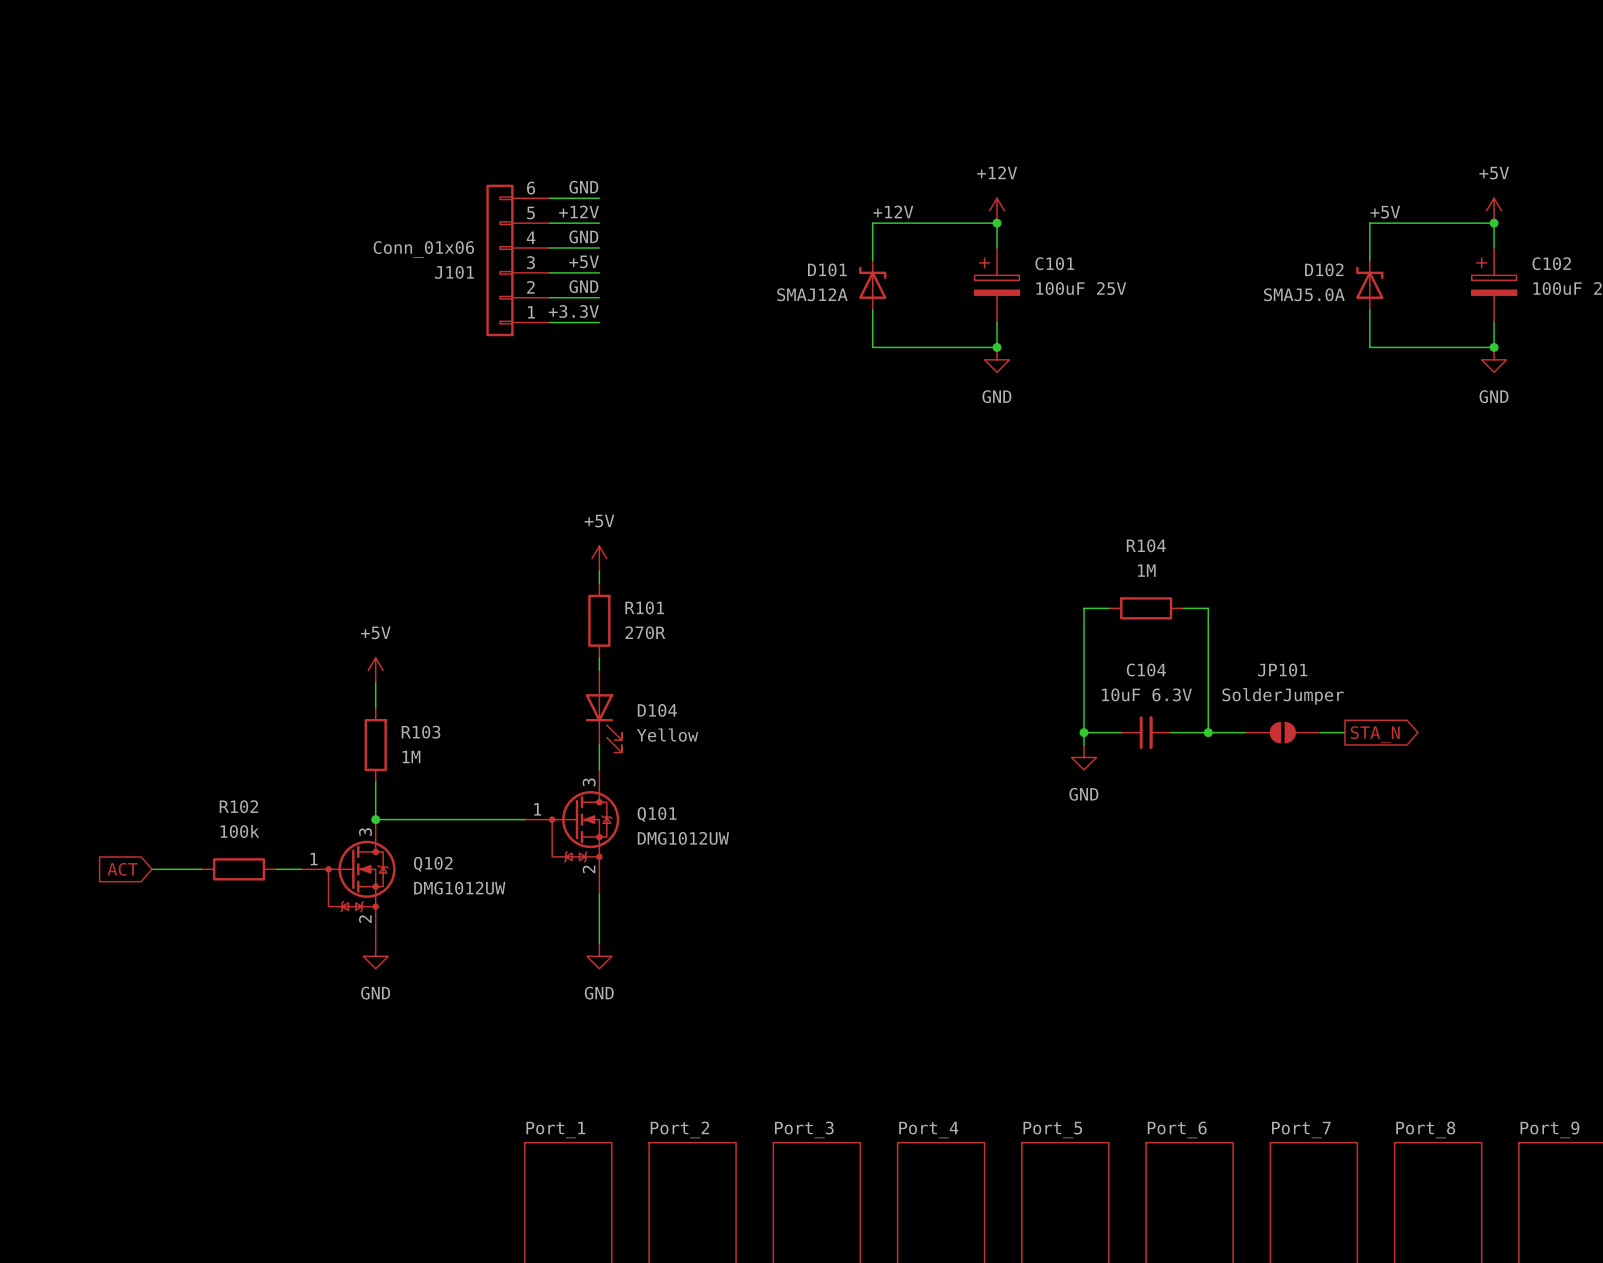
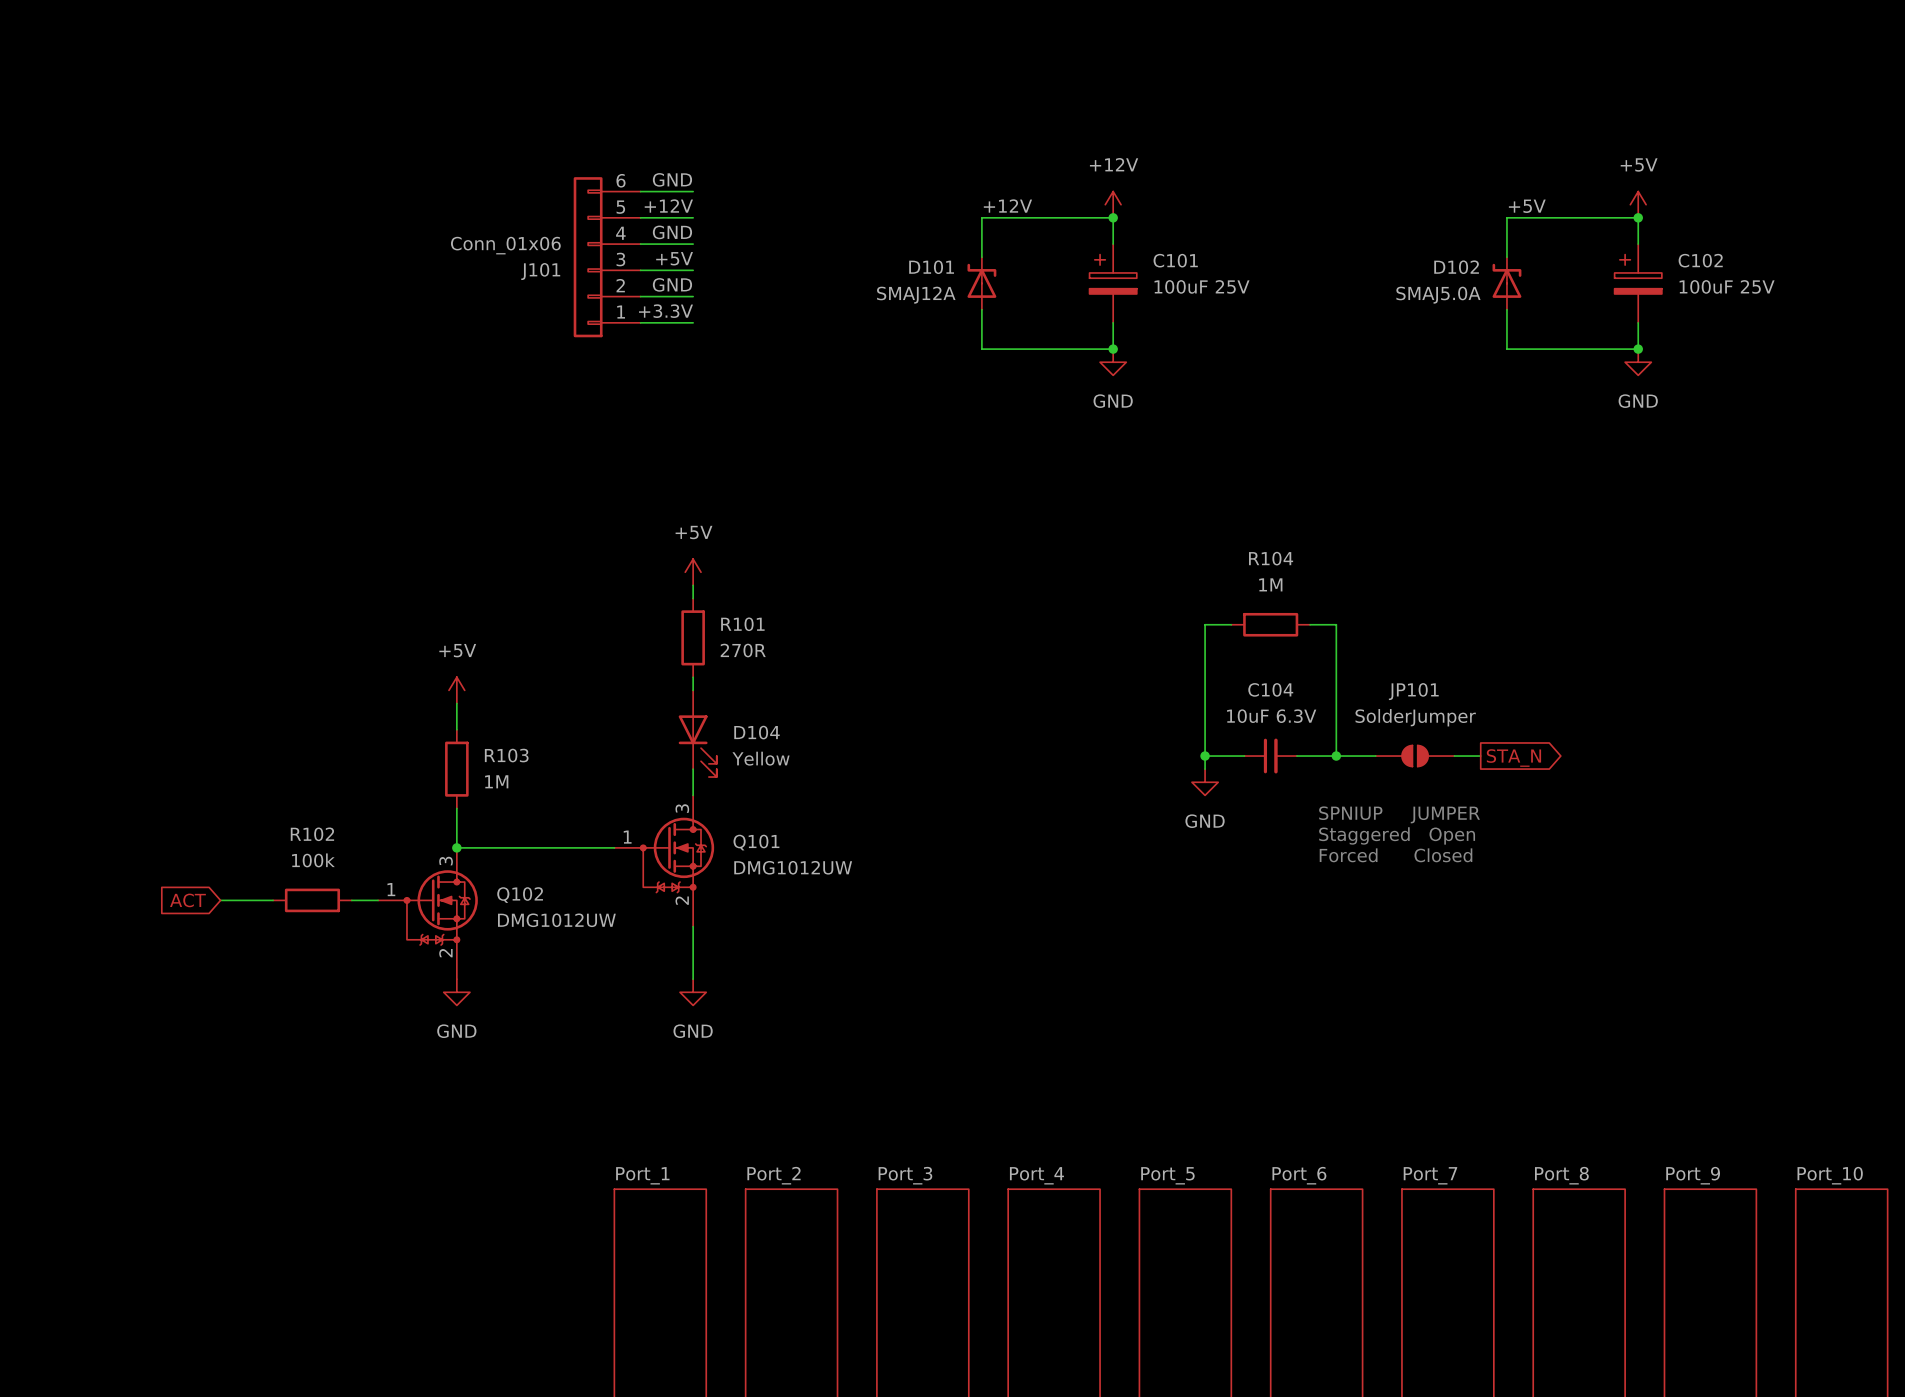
text: none -> SPNIUP JUMPER (1399, 814)
text: none -> Staggered Open (1397, 835)
text: none -> Forced Closed (1396, 855)

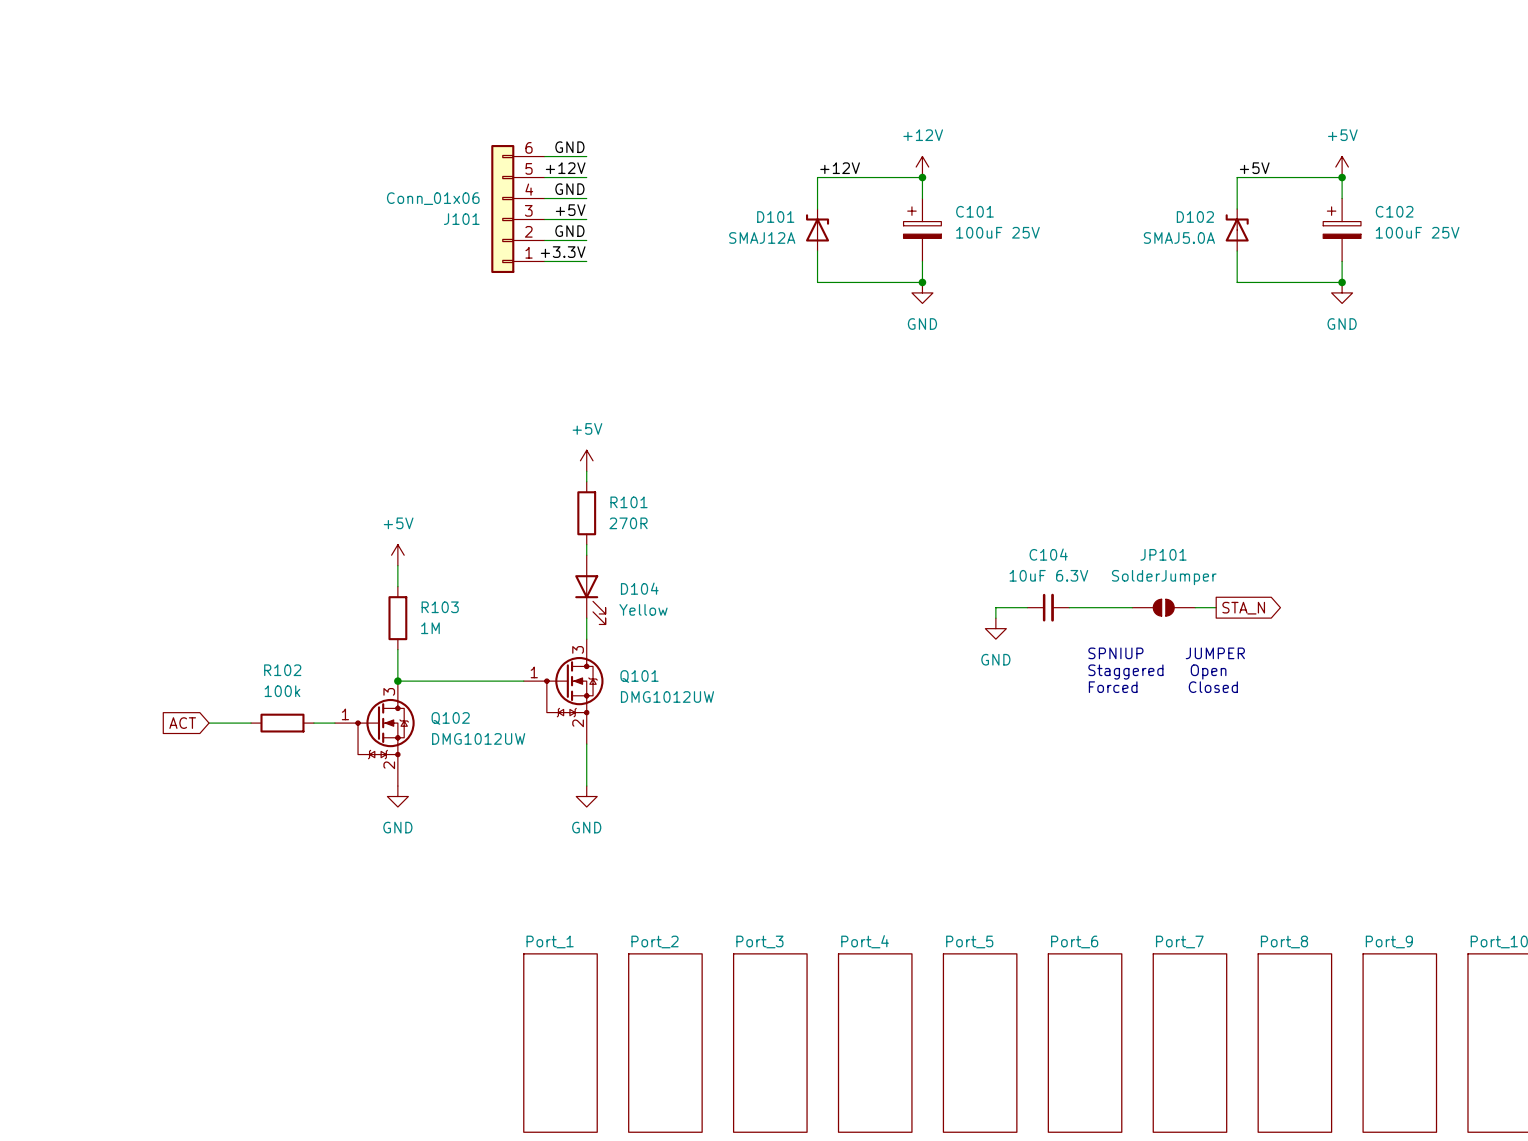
wire: (1231, 624) (1205, 624) (1205, 756) -> none
R104: 1M (1270, 624) -> none
wire: (1310, 624) (1336, 624) (1336, 756) -> none
junction: (1205, 756) -> none
junction: (1336, 756) -> none

